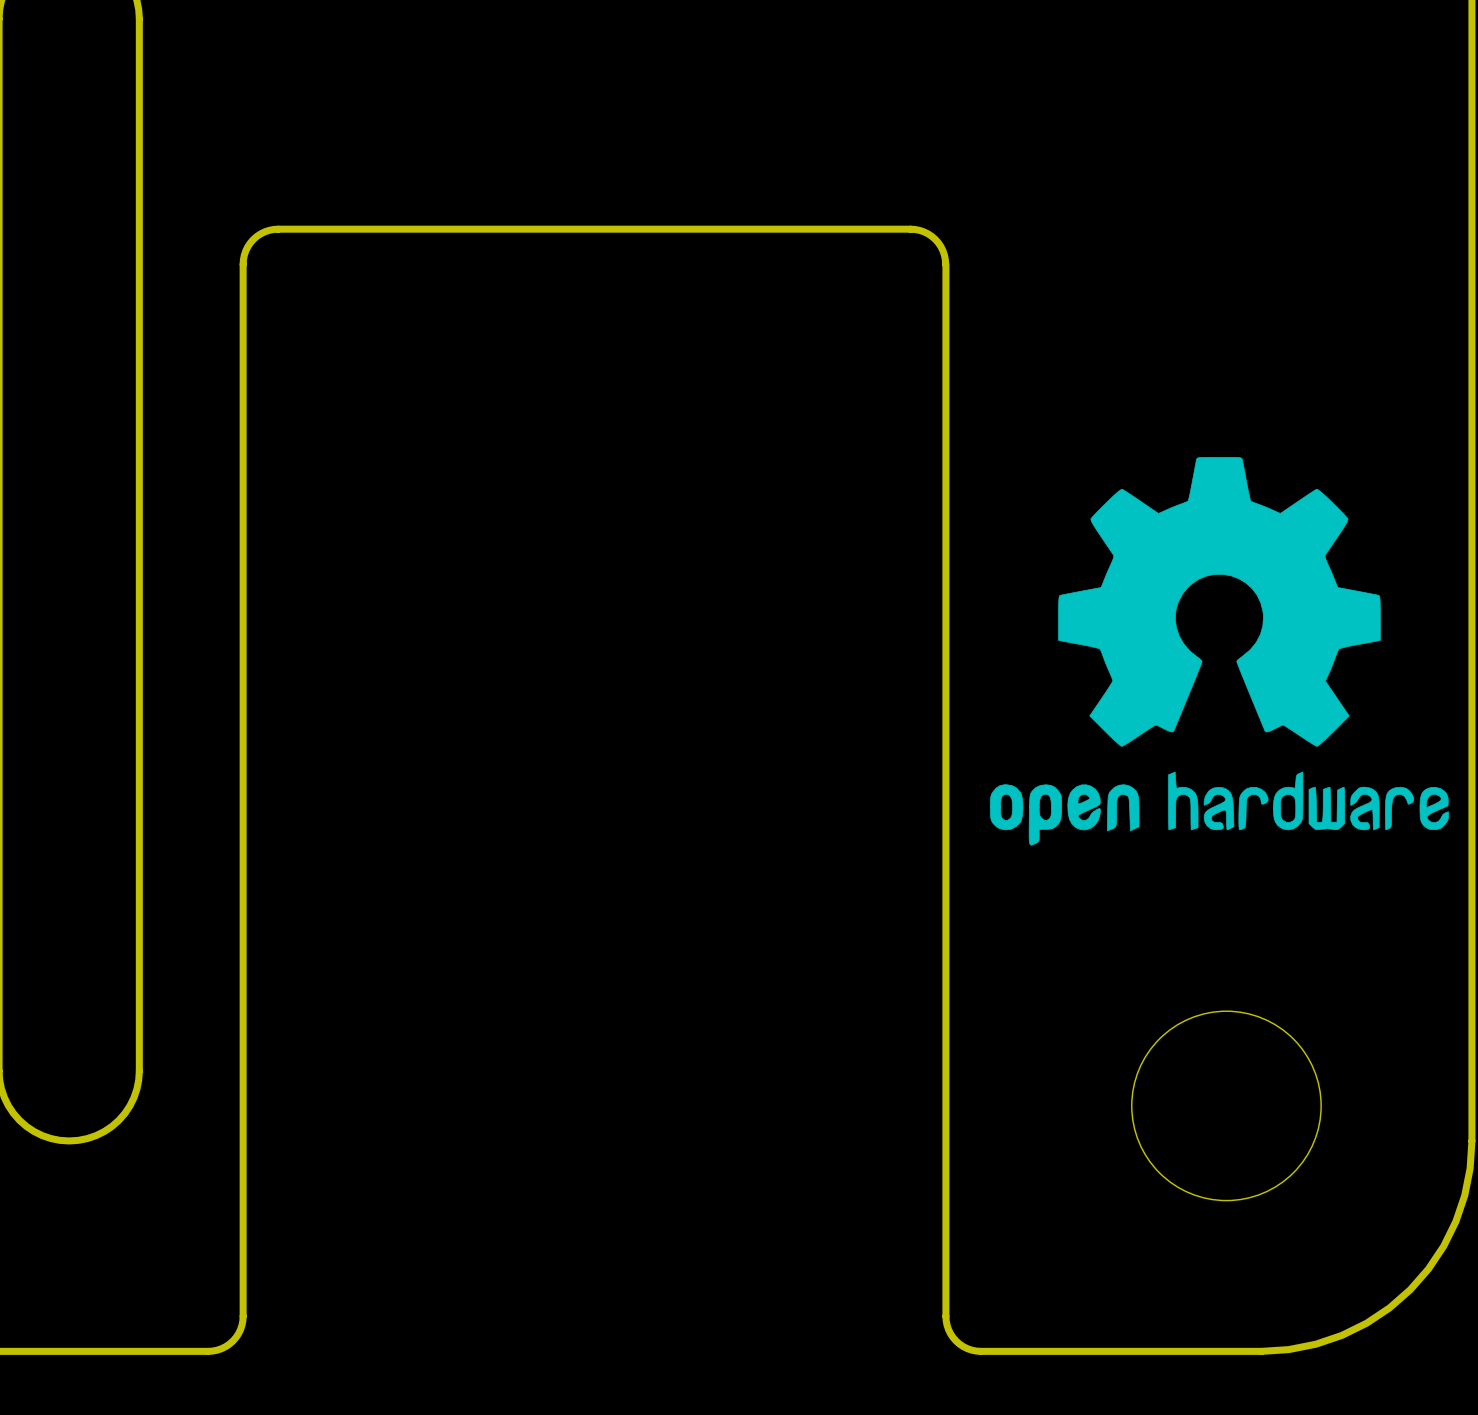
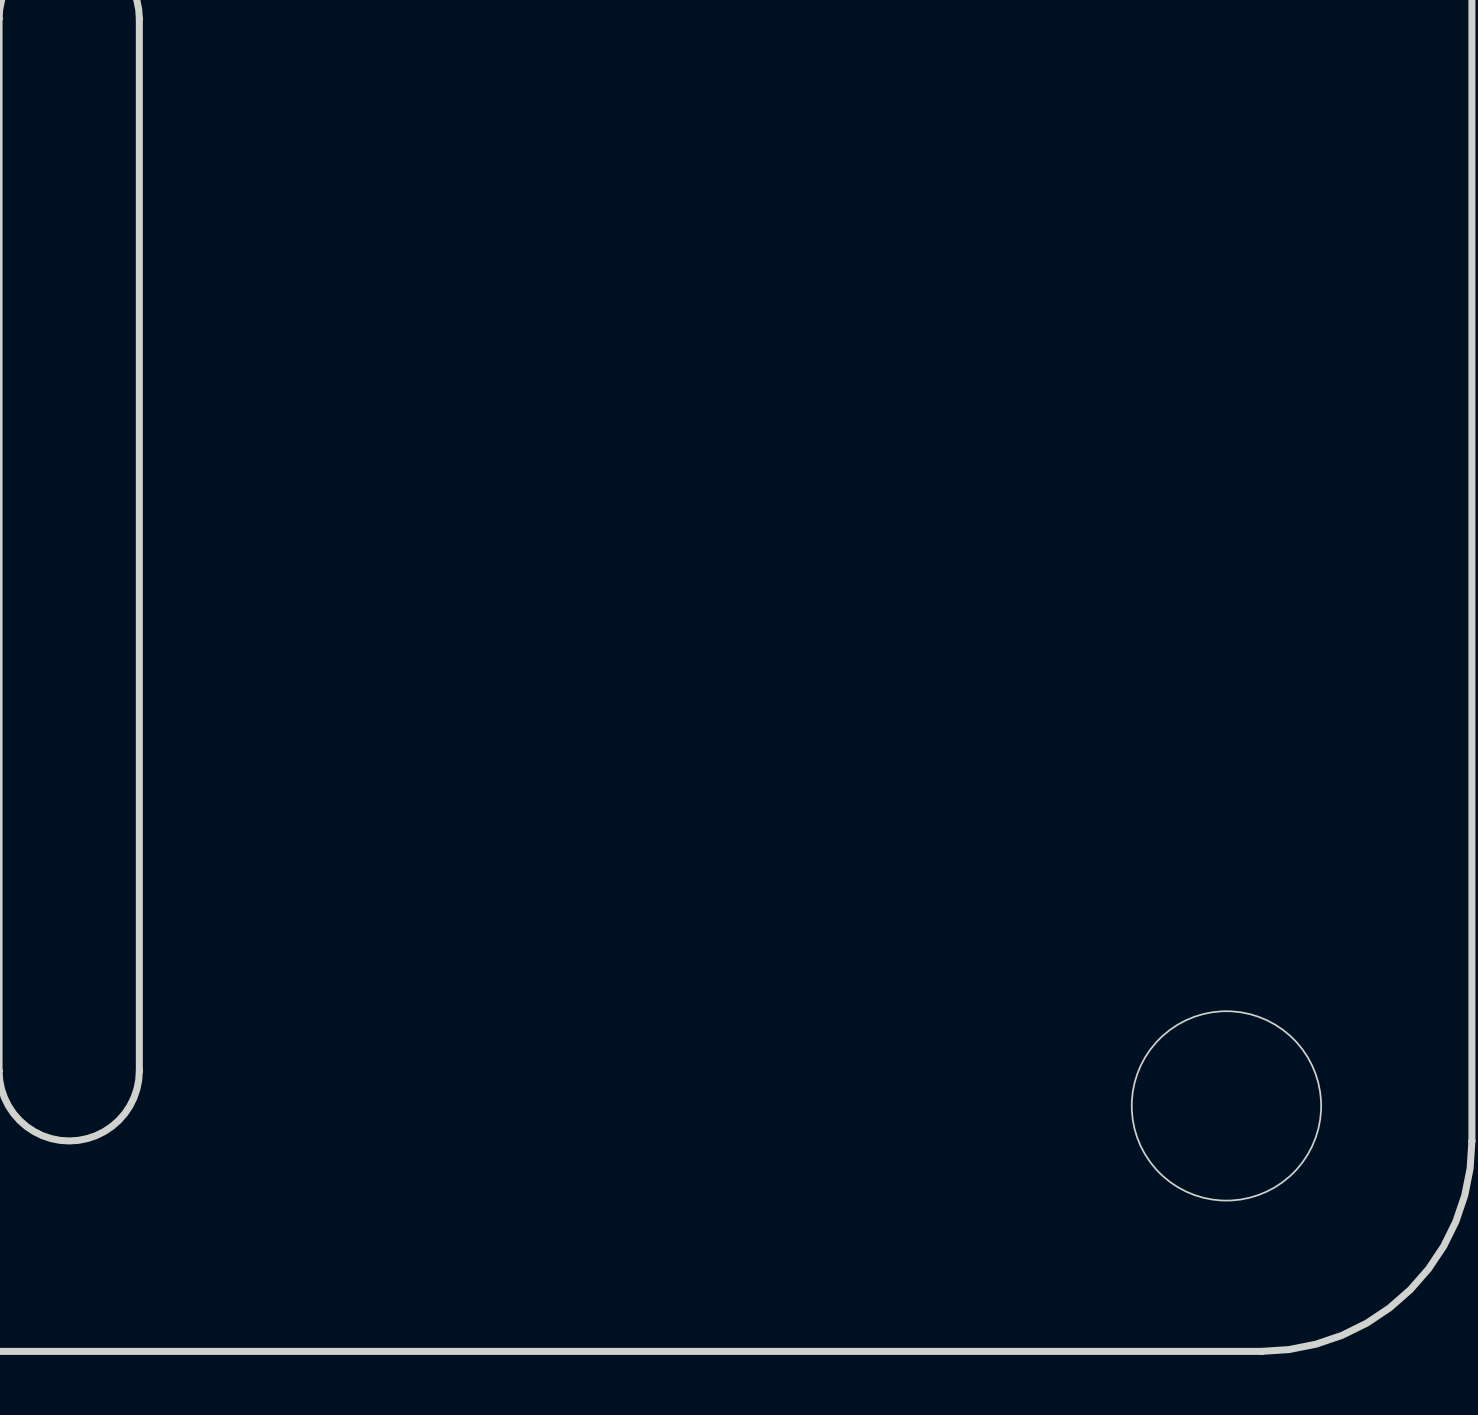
drawing: [990, 456, 1449, 846] -> none
board edge: (208, 1351) (221, 1348) (232, 1341) (240, 1329) (243, 1316) (243, 264) (245, 250) (253, 239) (264, 231) (278, 229) (910, 229) (928, 233) (940, 246) (945, 264) (945, 1316) (948, 1329) (956, 1341) (967, 1348) (980, 1351) -> (208, 1351) (980, 1351)

